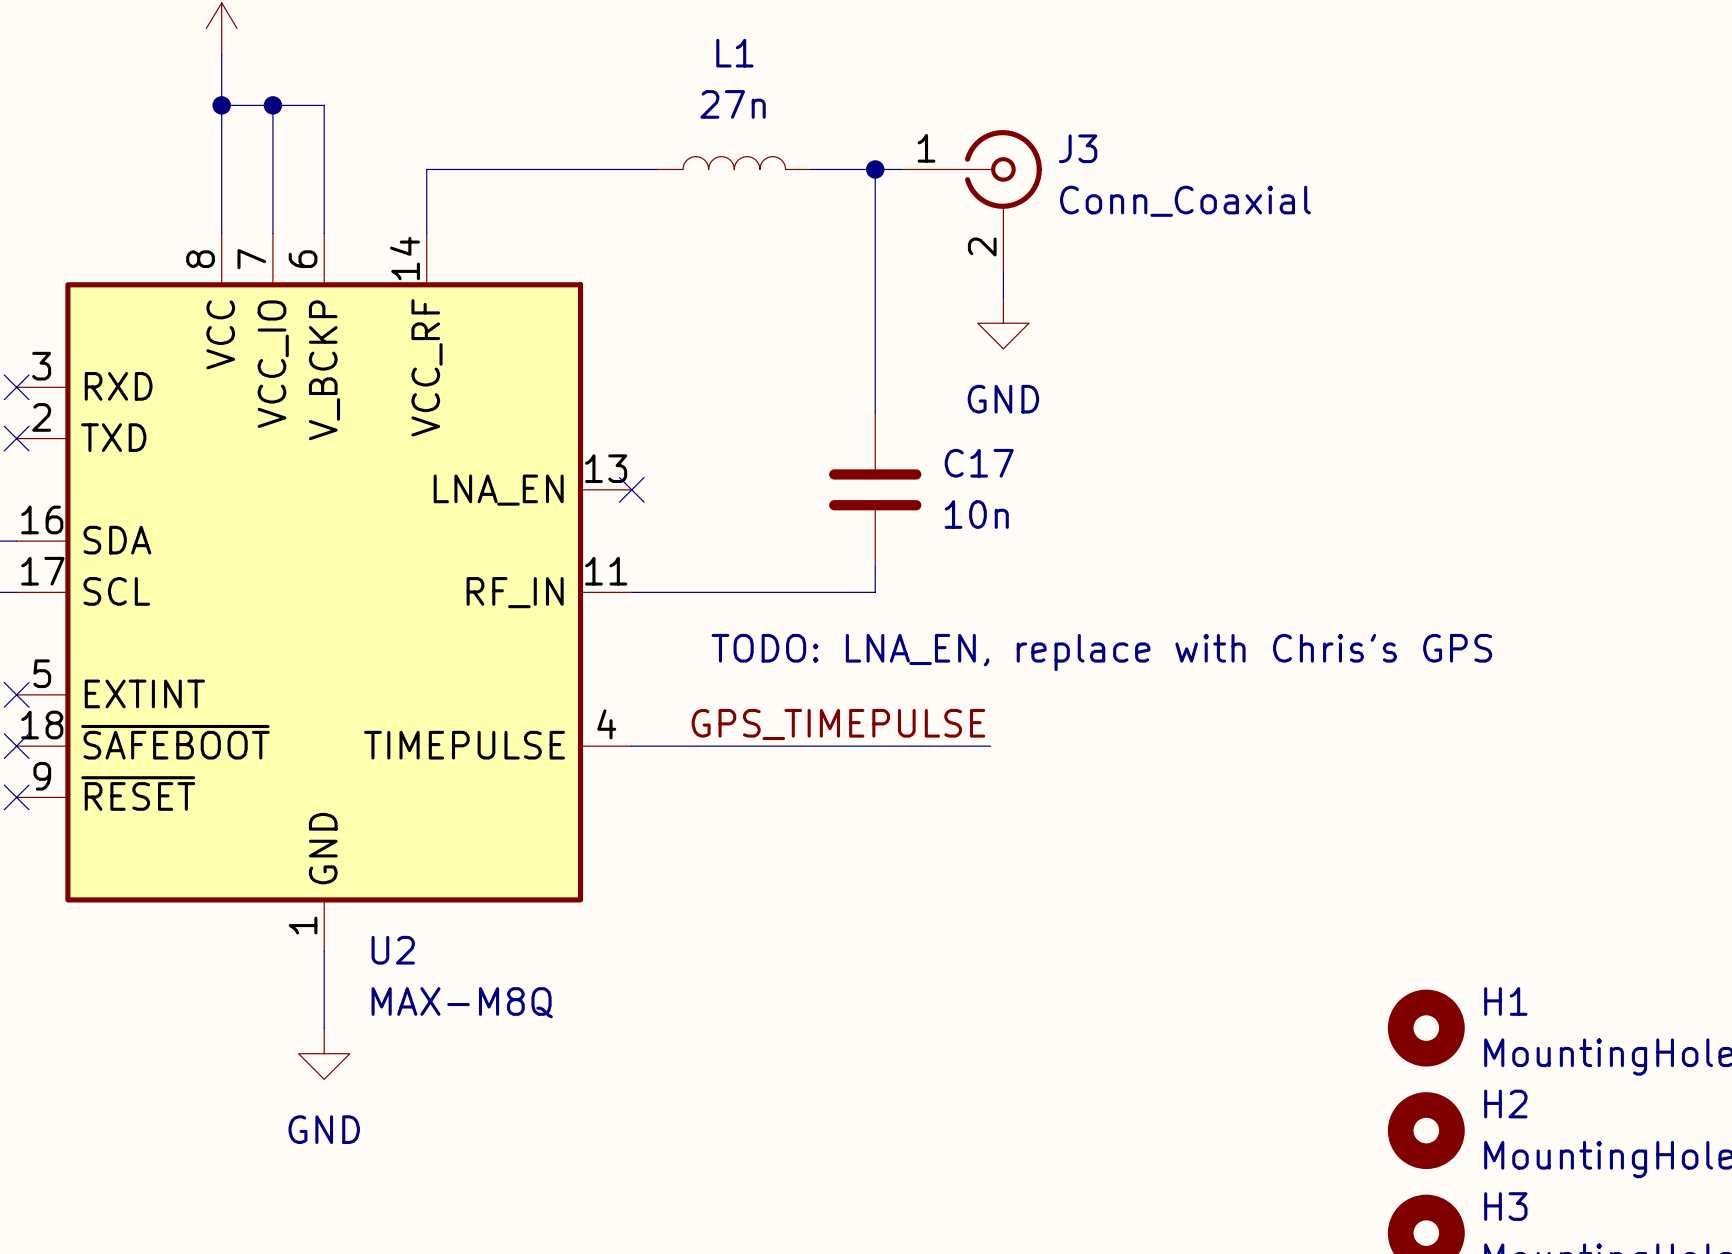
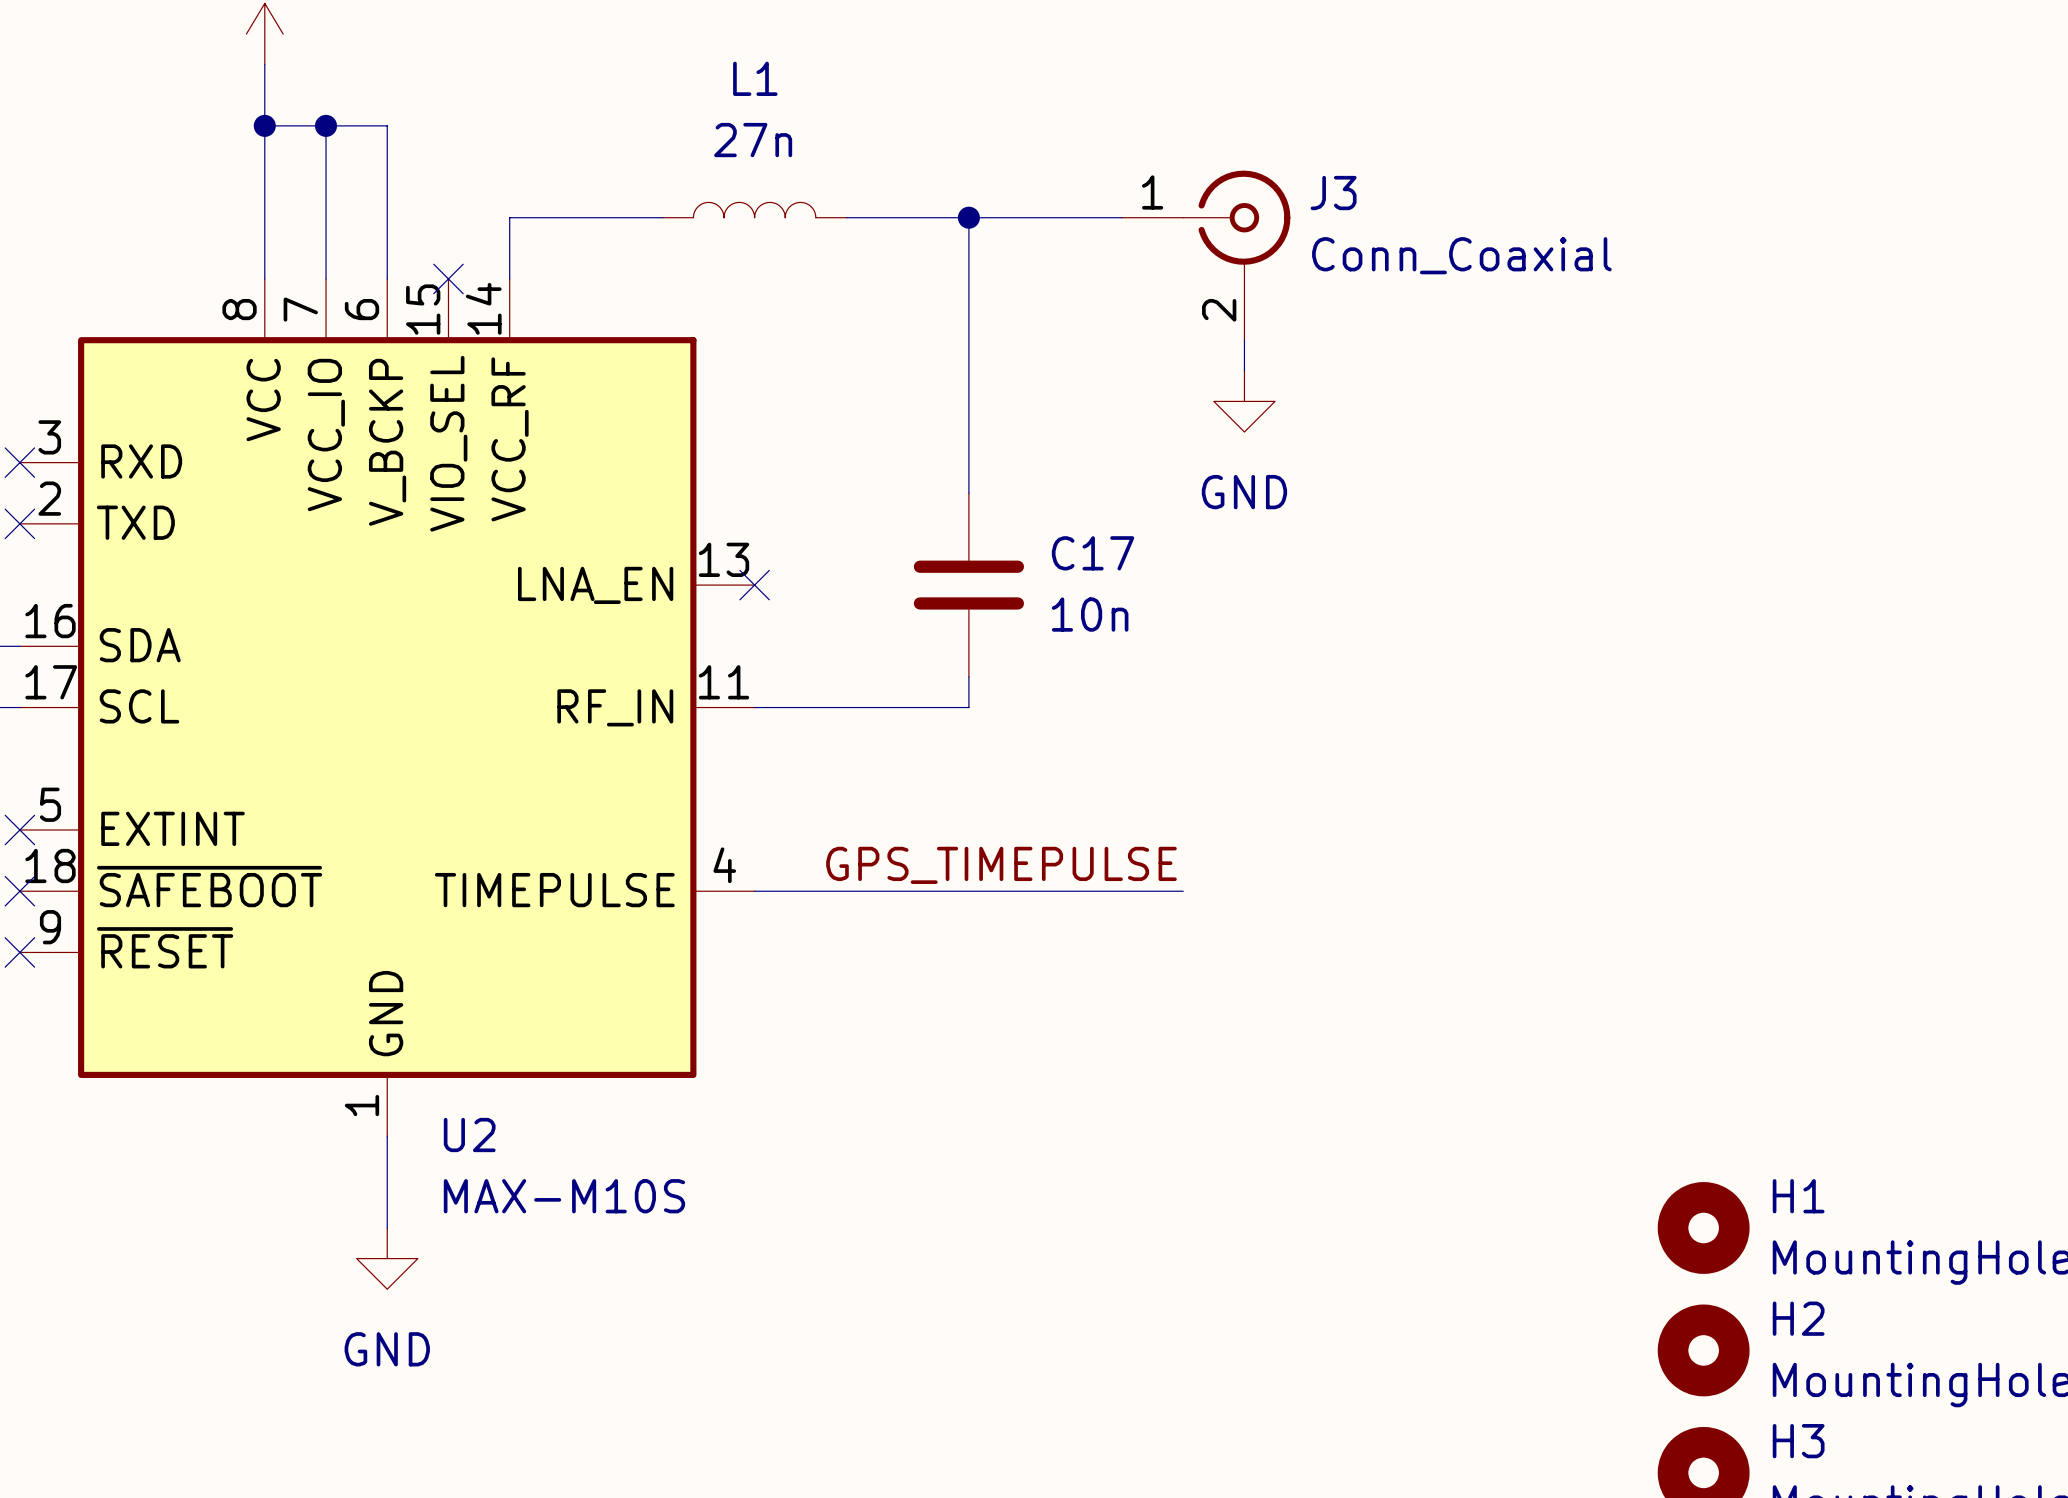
L1 position: (734, 163) -> (754, 210)
wire: (657, 169) (426, 169) (426, 182) -> (662, 217) (509, 217)
wire: (811, 169) (900, 169) -> none
wire: (875, 169) (875, 412) -> none
junction position: (875, 169) -> (968, 217)
wire: none -> (846, 217) (1121, 217)
wire: none -> (968, 217) (968, 493)
J3 position: (971, 201) -> (1206, 255)
U2 symbol: [16, 233, 632, 952] -> [19, 278, 755, 1137]
no-connect mark: none -> (448, 278)
wire: (1003, 271) (1003, 297) -> (1244, 340) (1244, 370)
power symbol position: GND (1003, 323) -> GND (1244, 401)
C17 position: (875, 489) -> (968, 585)
wire: (875, 566) (875, 592) (811, 592) -> (968, 676) (968, 707)
text: TODO: LNA_EN, replace with Chris's GPS (1101, 652) -> none
U2 value: MAX-M8Q (462, 1002) -> MAX-M10S (564, 1196)

